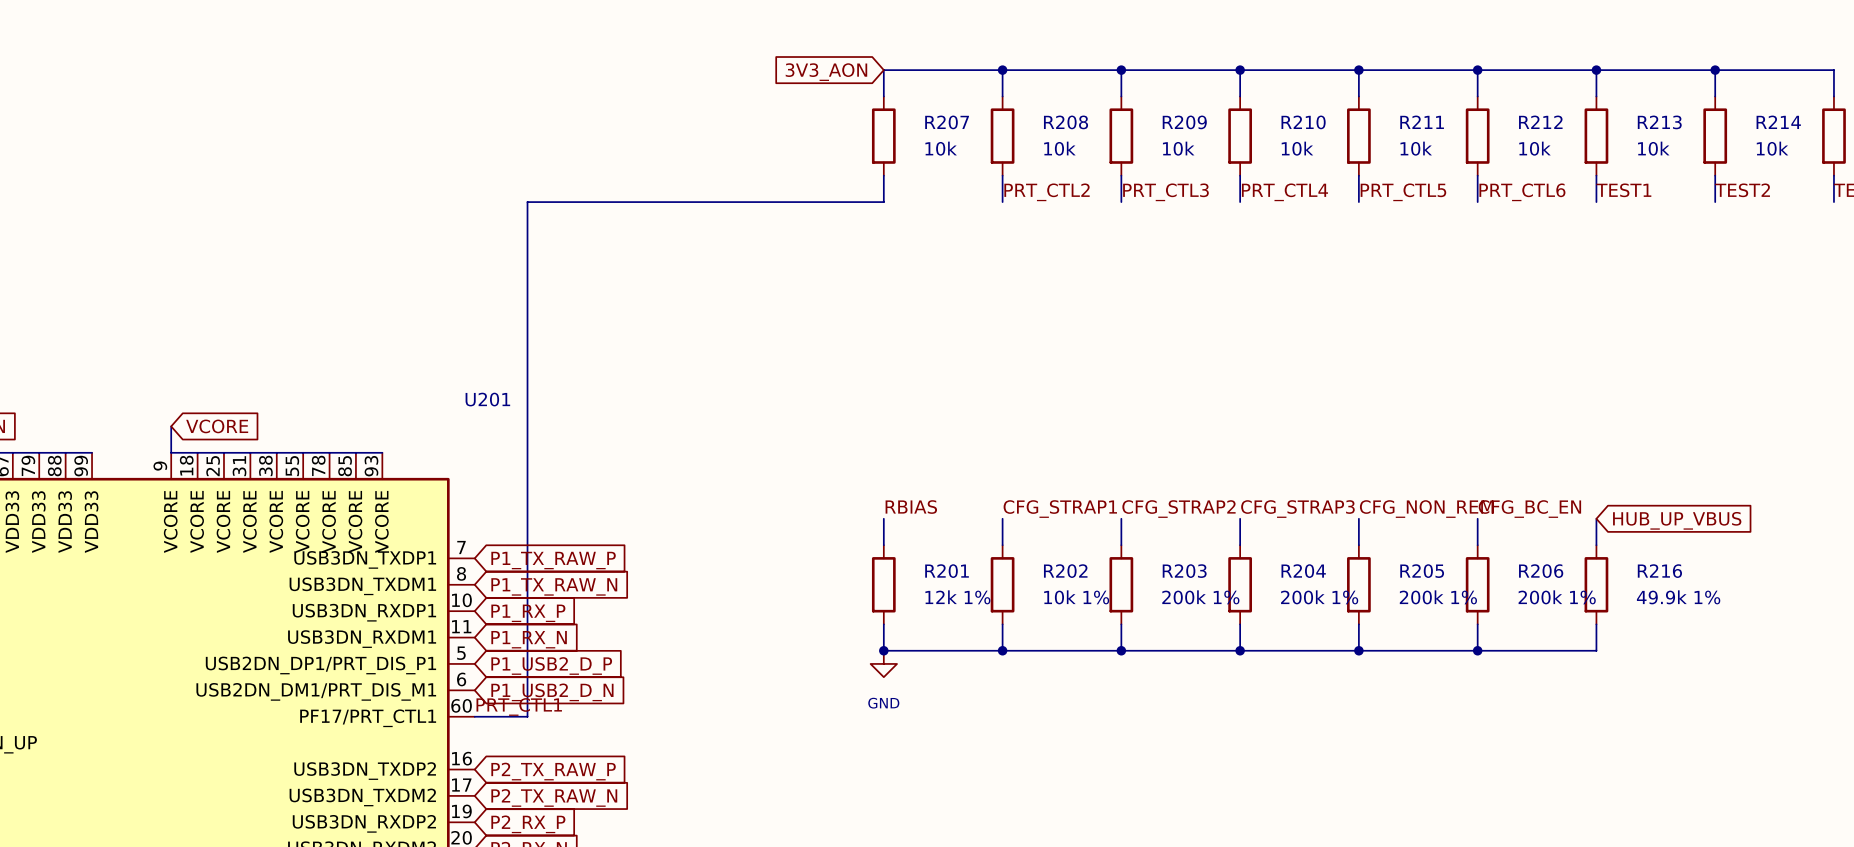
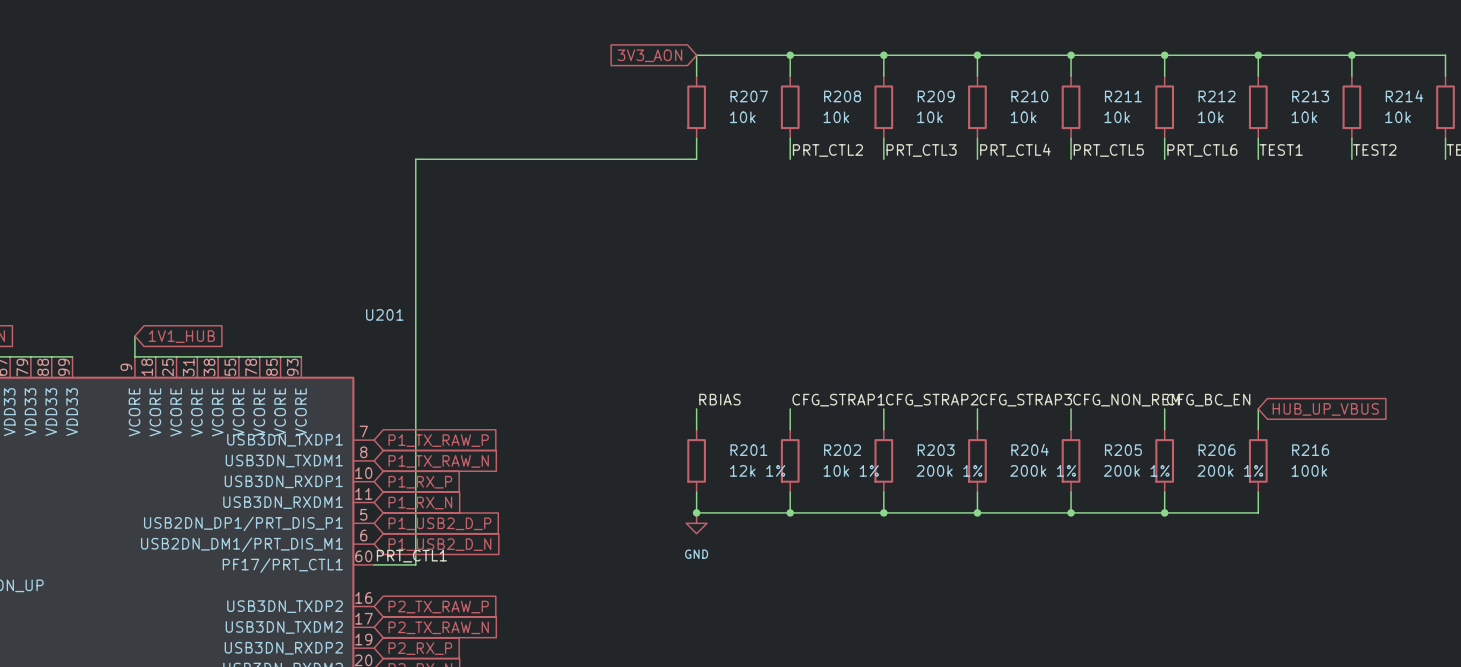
global label: VCORE (217, 426) -> 1V1_HUB (181, 336)
R216 value: 49.9k 1% (1678, 597) -> 100k (1309, 470)

